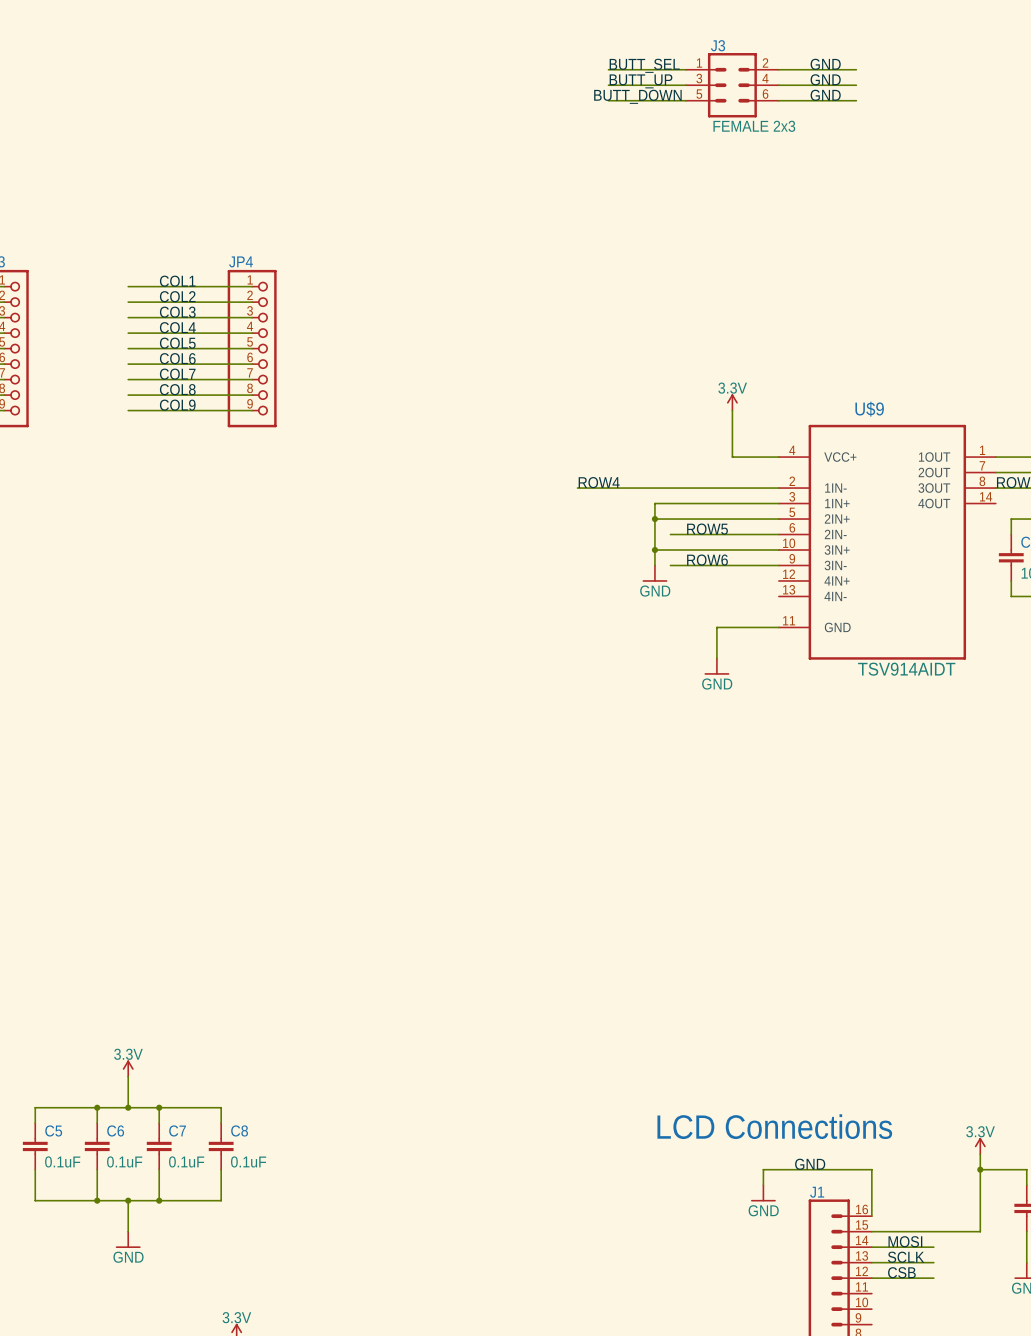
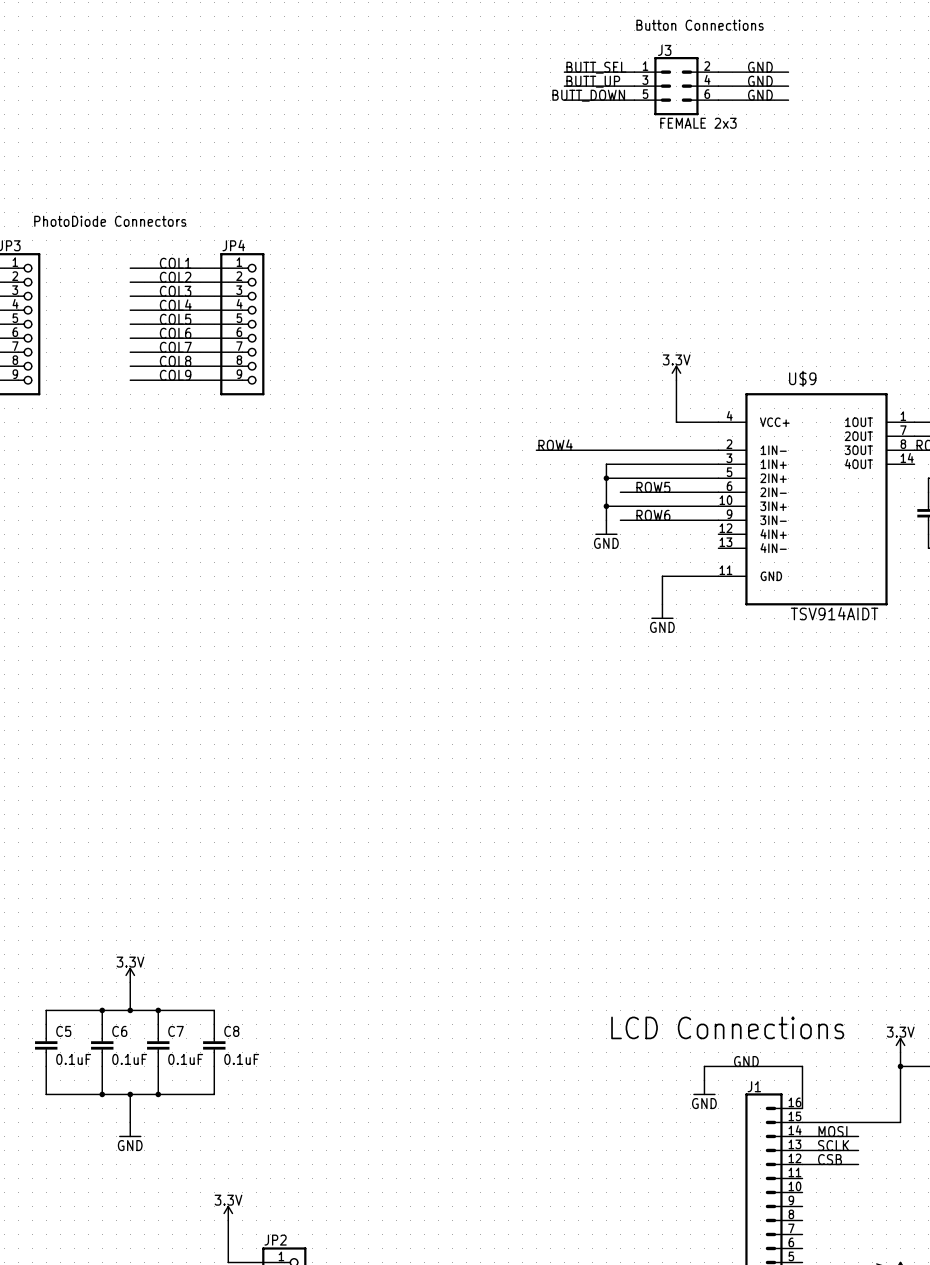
text: none -> Button Connections (700, 25)
text: none -> PhotoDiode Connectors (110, 221)

